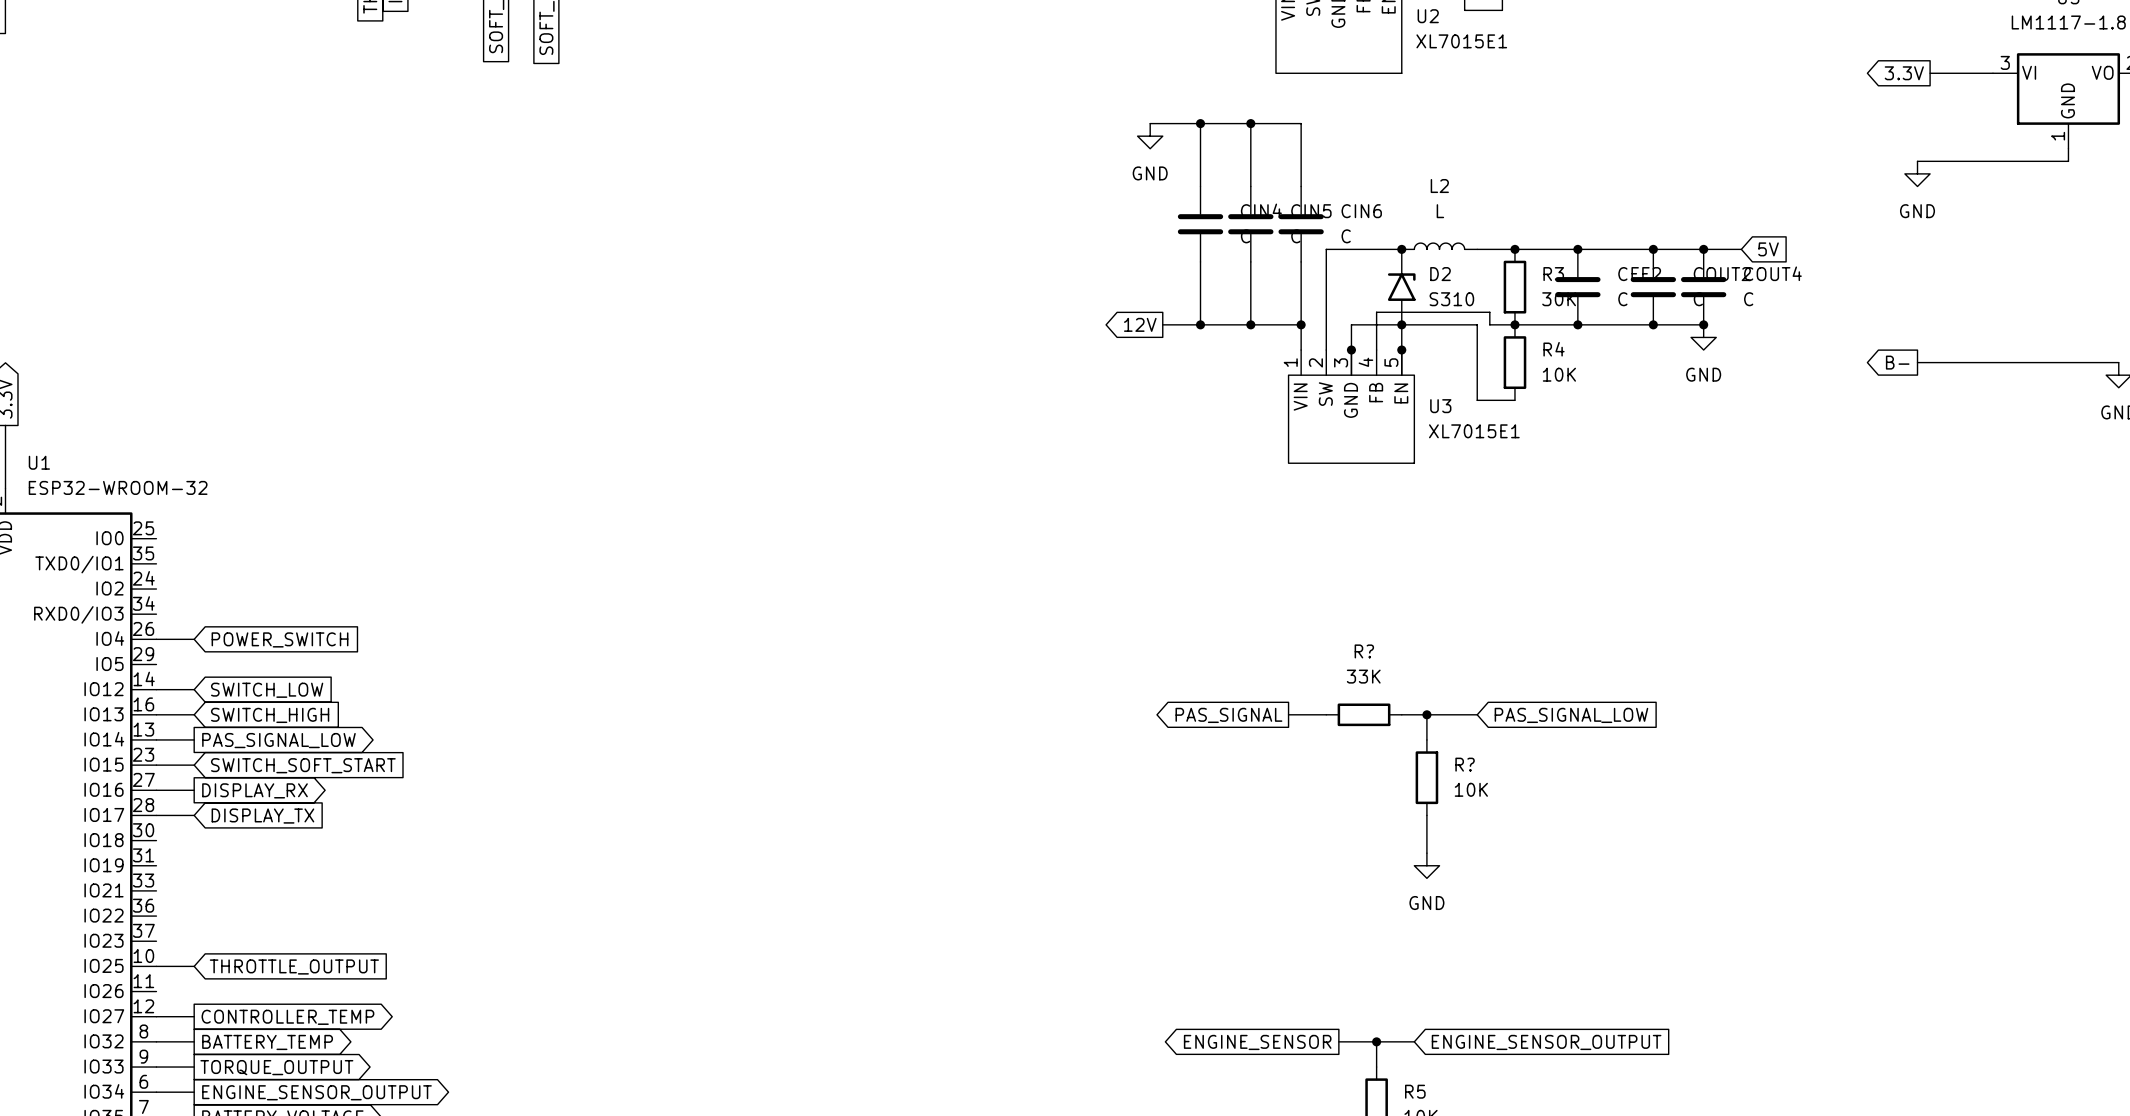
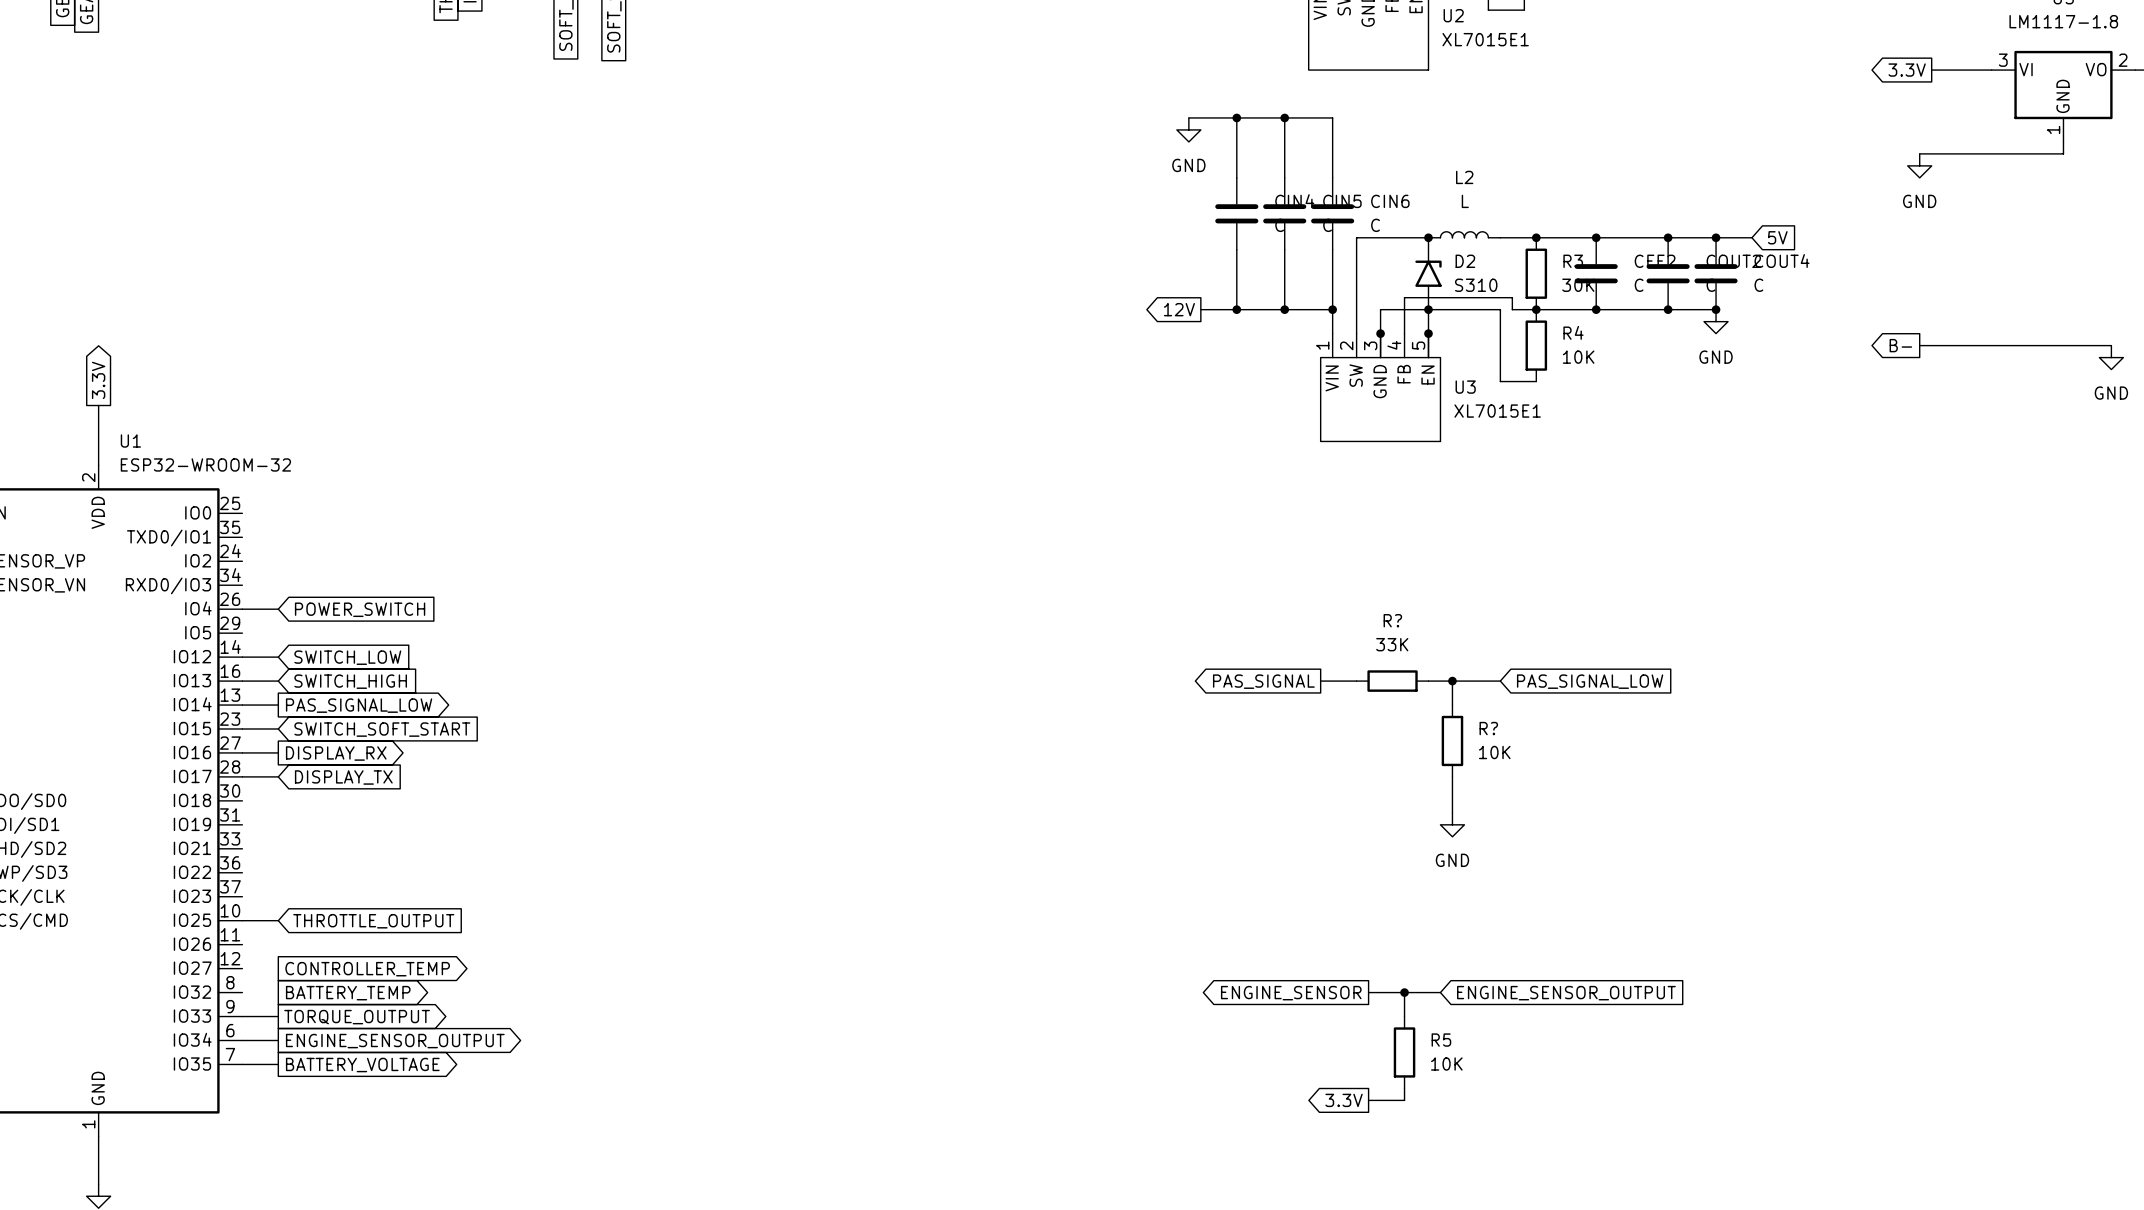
wire: (156, 1016) (194, 1016) -> none
wire: (156, 1041) (194, 1041) -> none

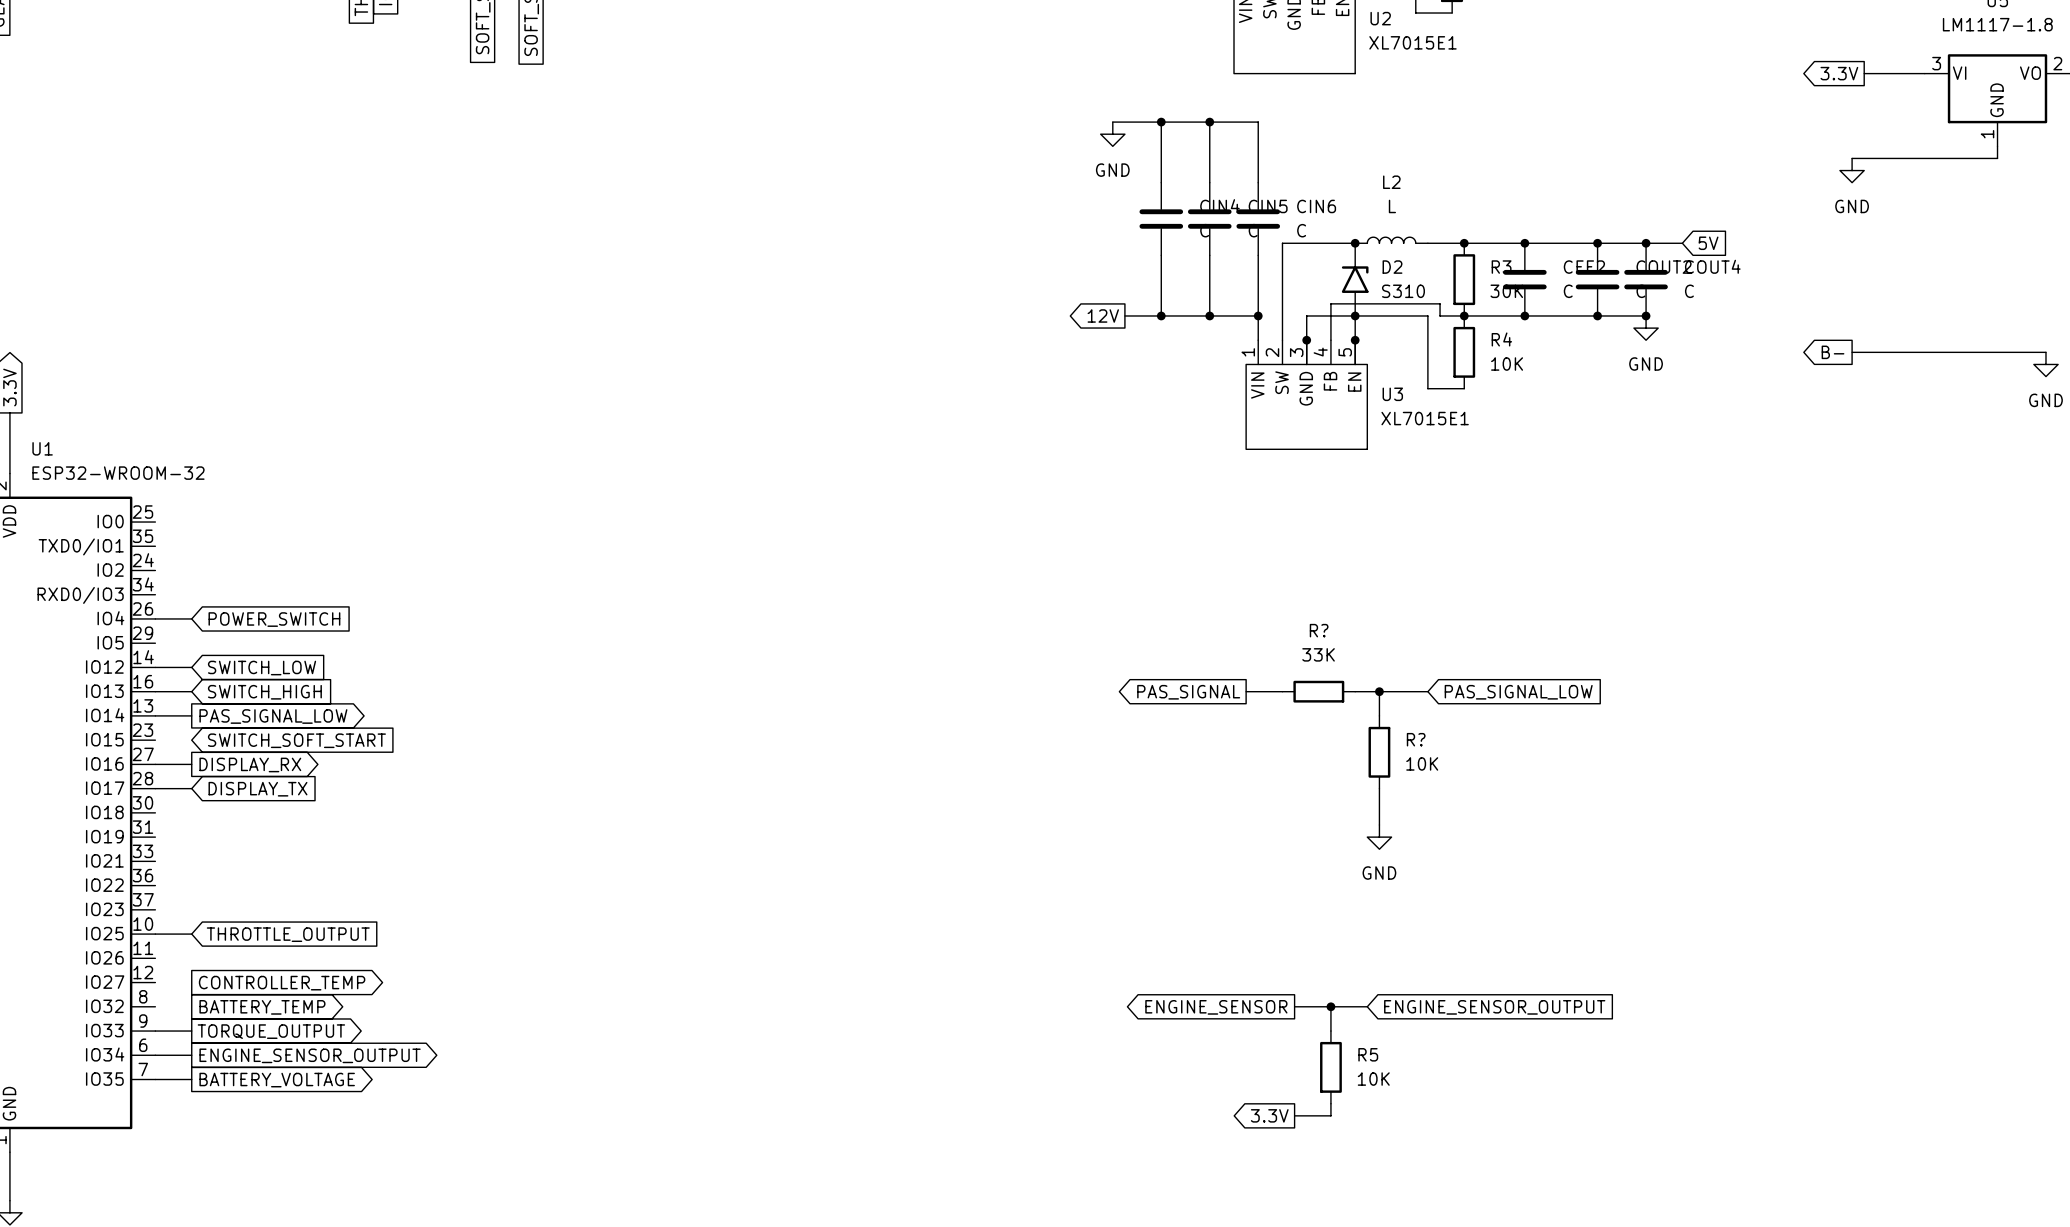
wire: (242, 728) (278, 728) -> none

